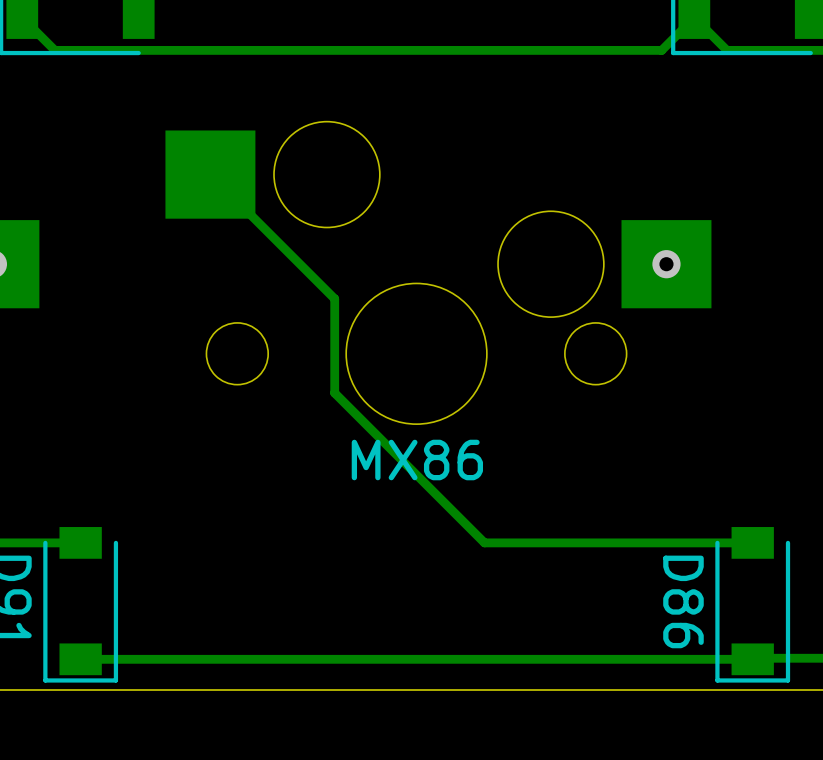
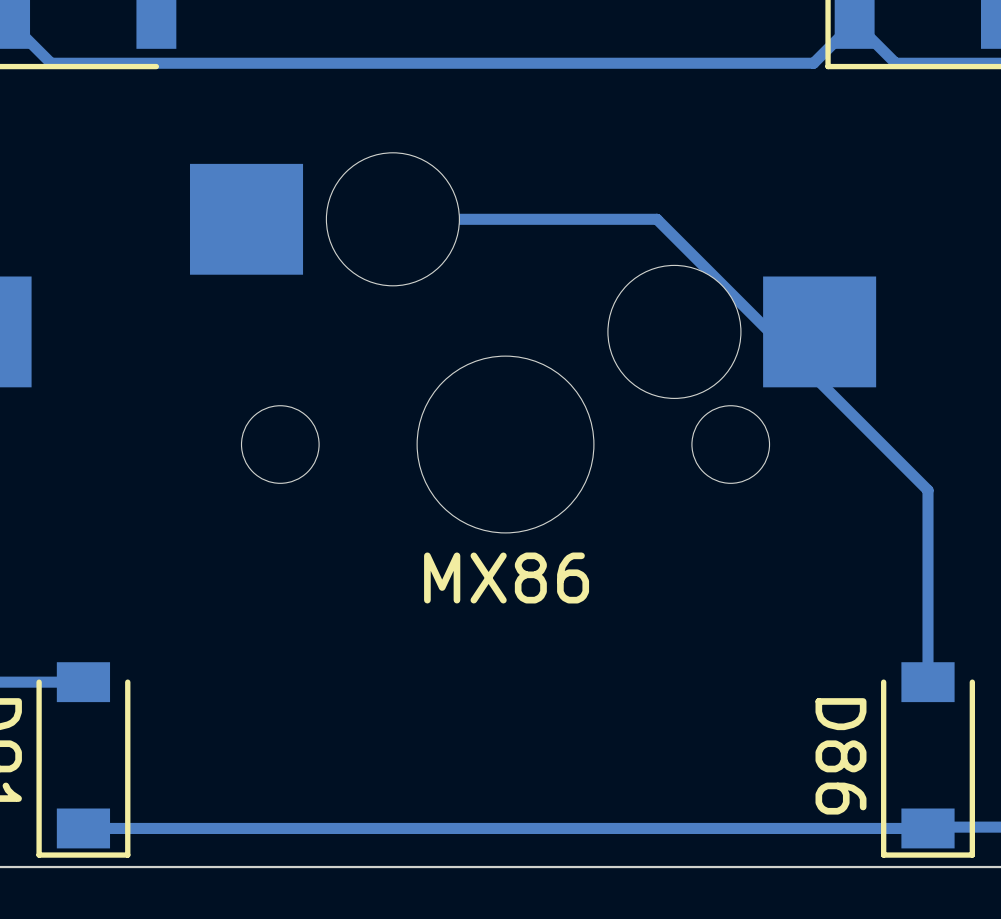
track: (210, 174) (334, 298) (334, 393) (484, 542) (752, 542) -> (392, 219) (656, 219) (928, 490) (928, 682)
via: (666, 264) -> none

